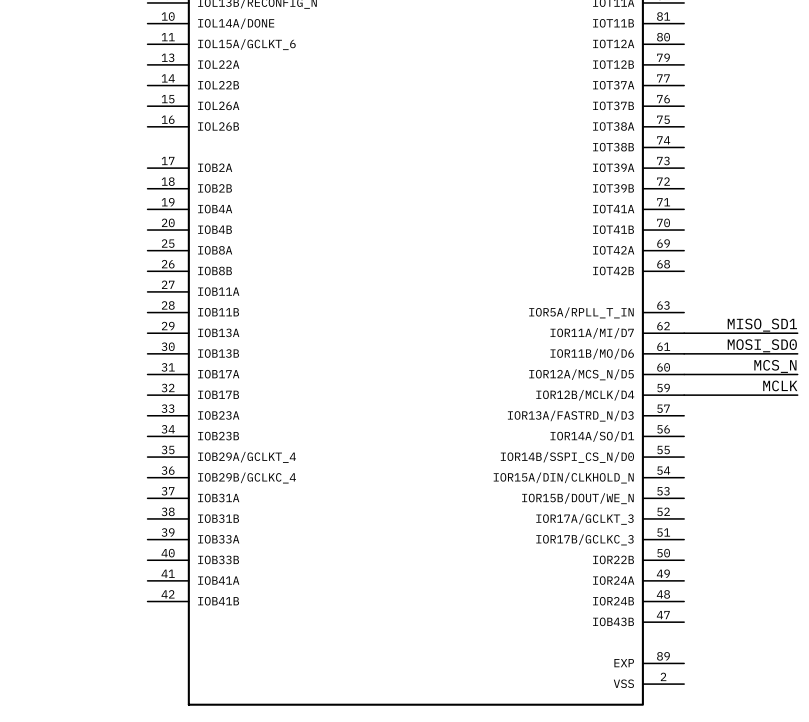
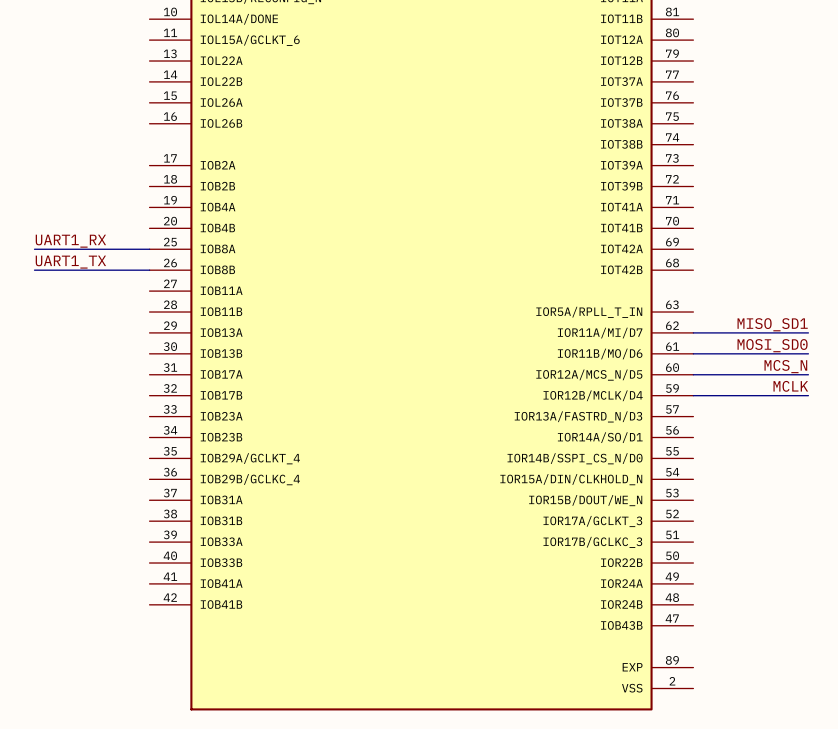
label: none -> UART1_RX (70, 241)
wire: none -> (34, 249) (149, 249)
label: none -> UART1_TX (70, 262)
wire: none -> (34, 270) (149, 270)

